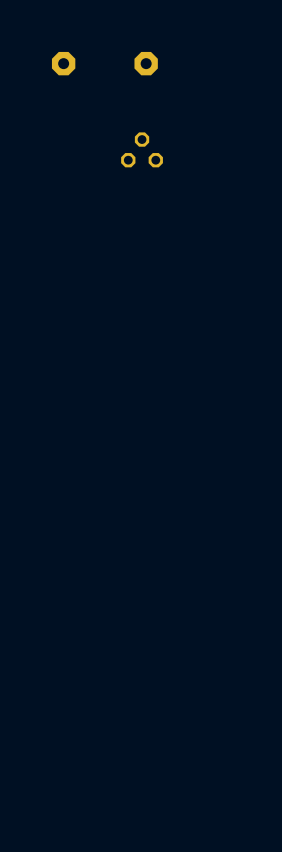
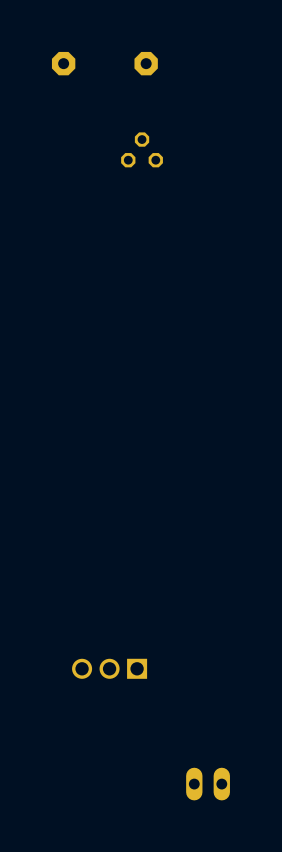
part: none -> (109, 668)
part: none -> (208, 784)

